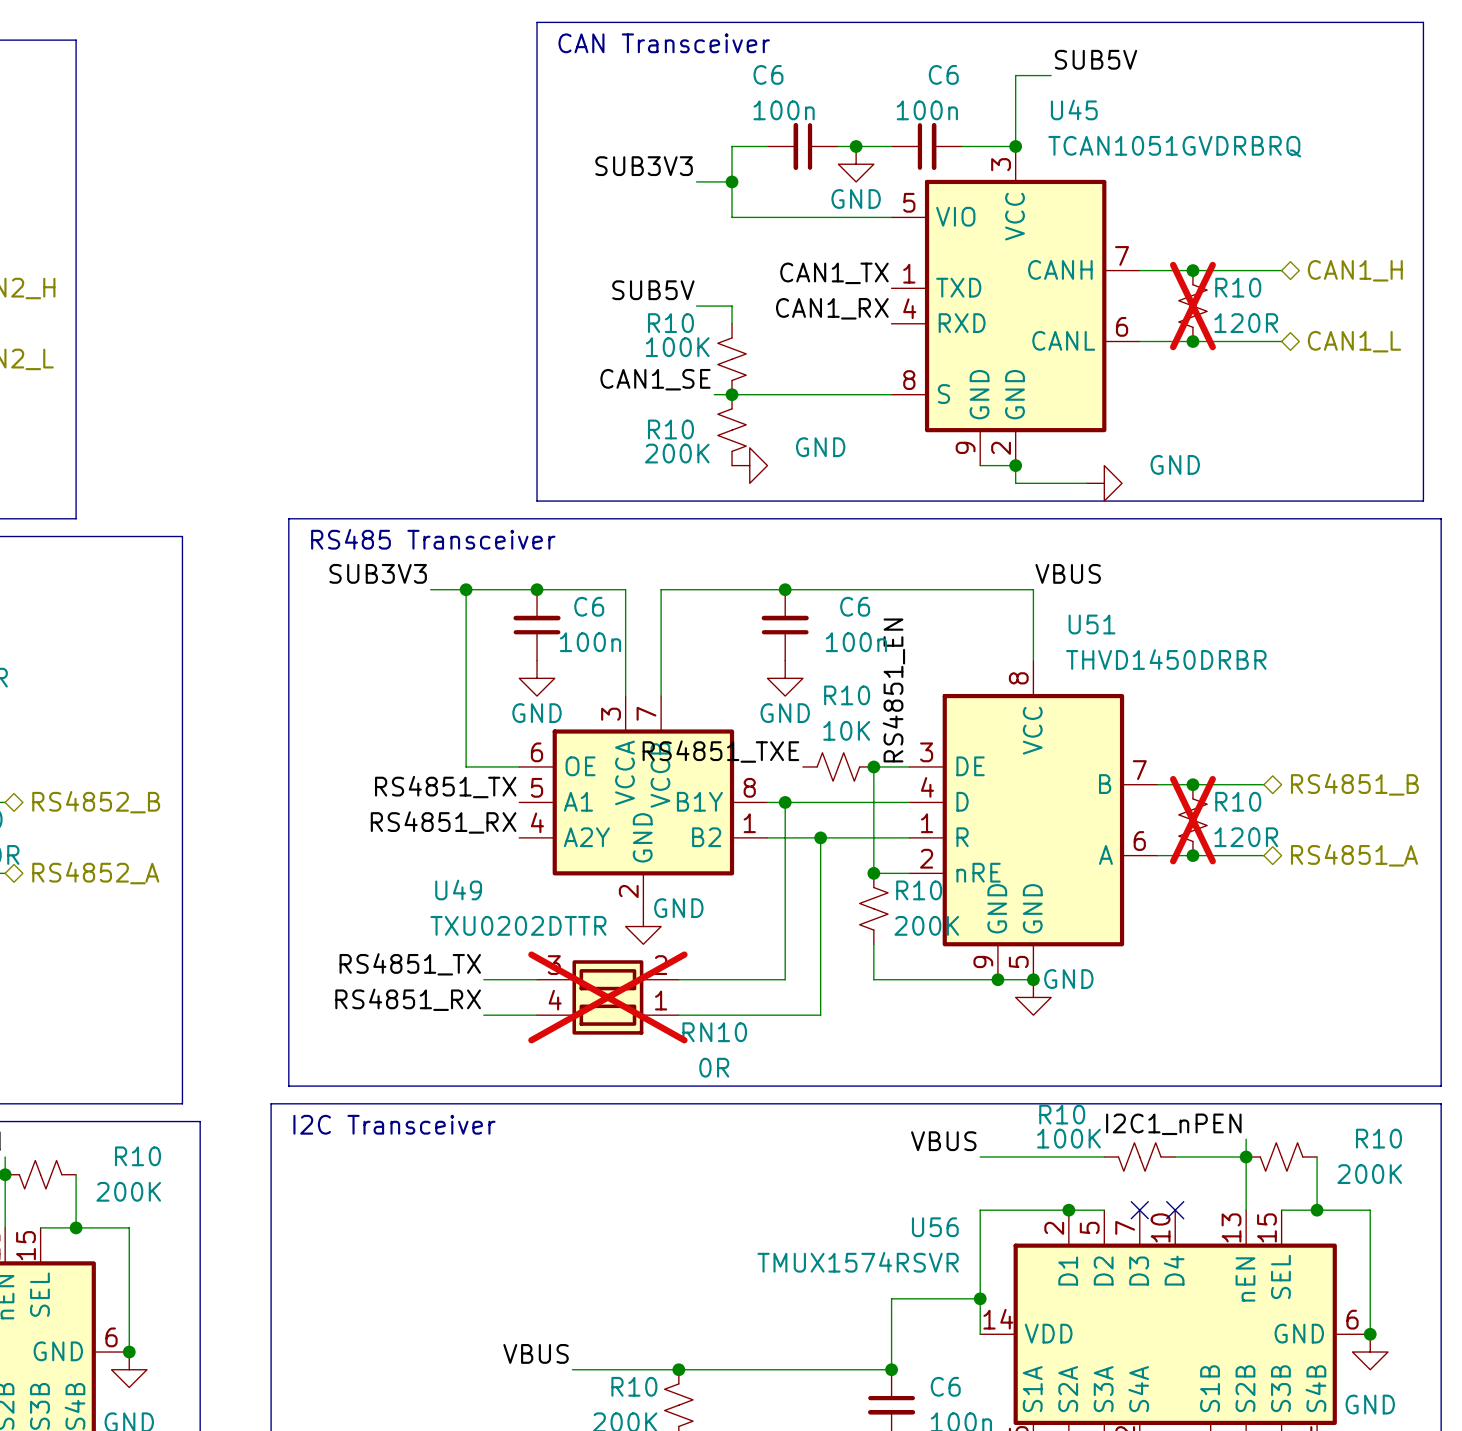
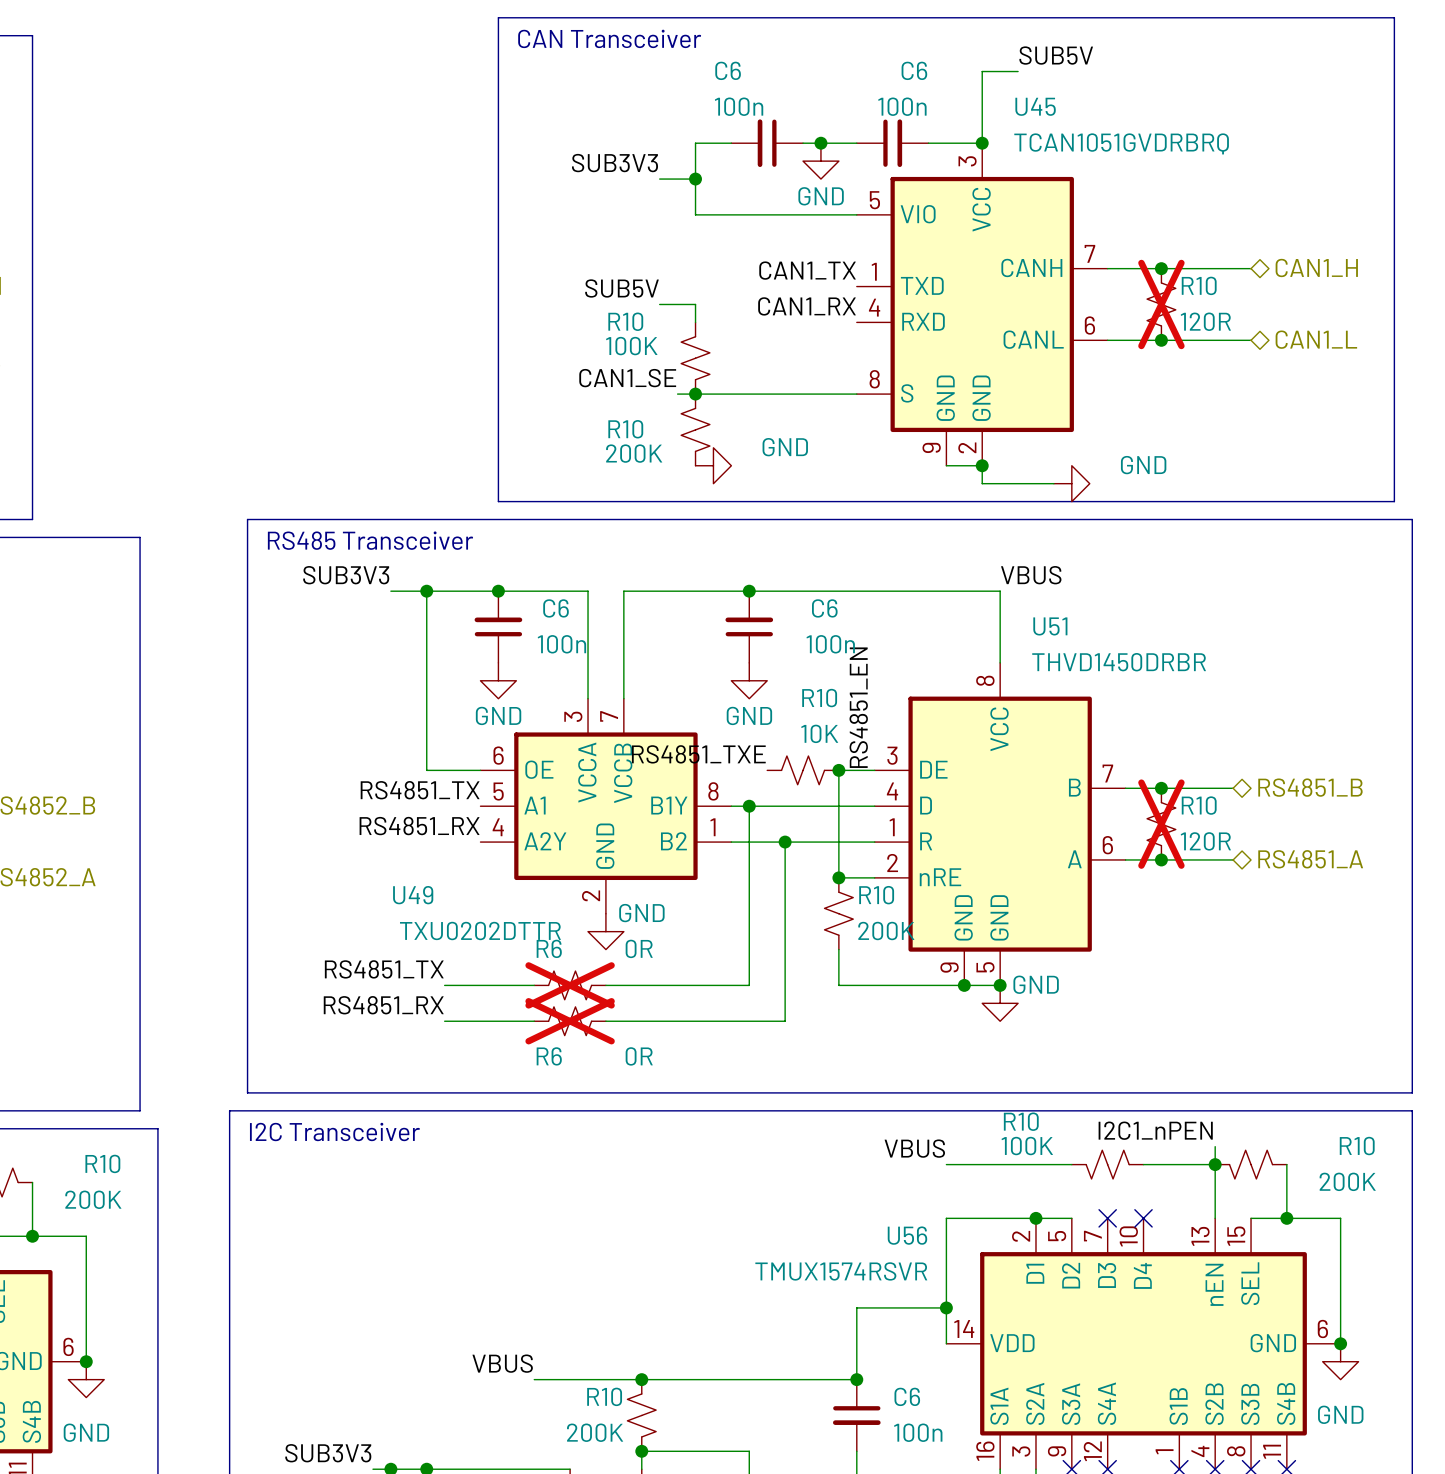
R6: none -> 0R (570, 985)
RN10: 0R (607, 997) -> none
R6: none -> 0R (570, 1021)

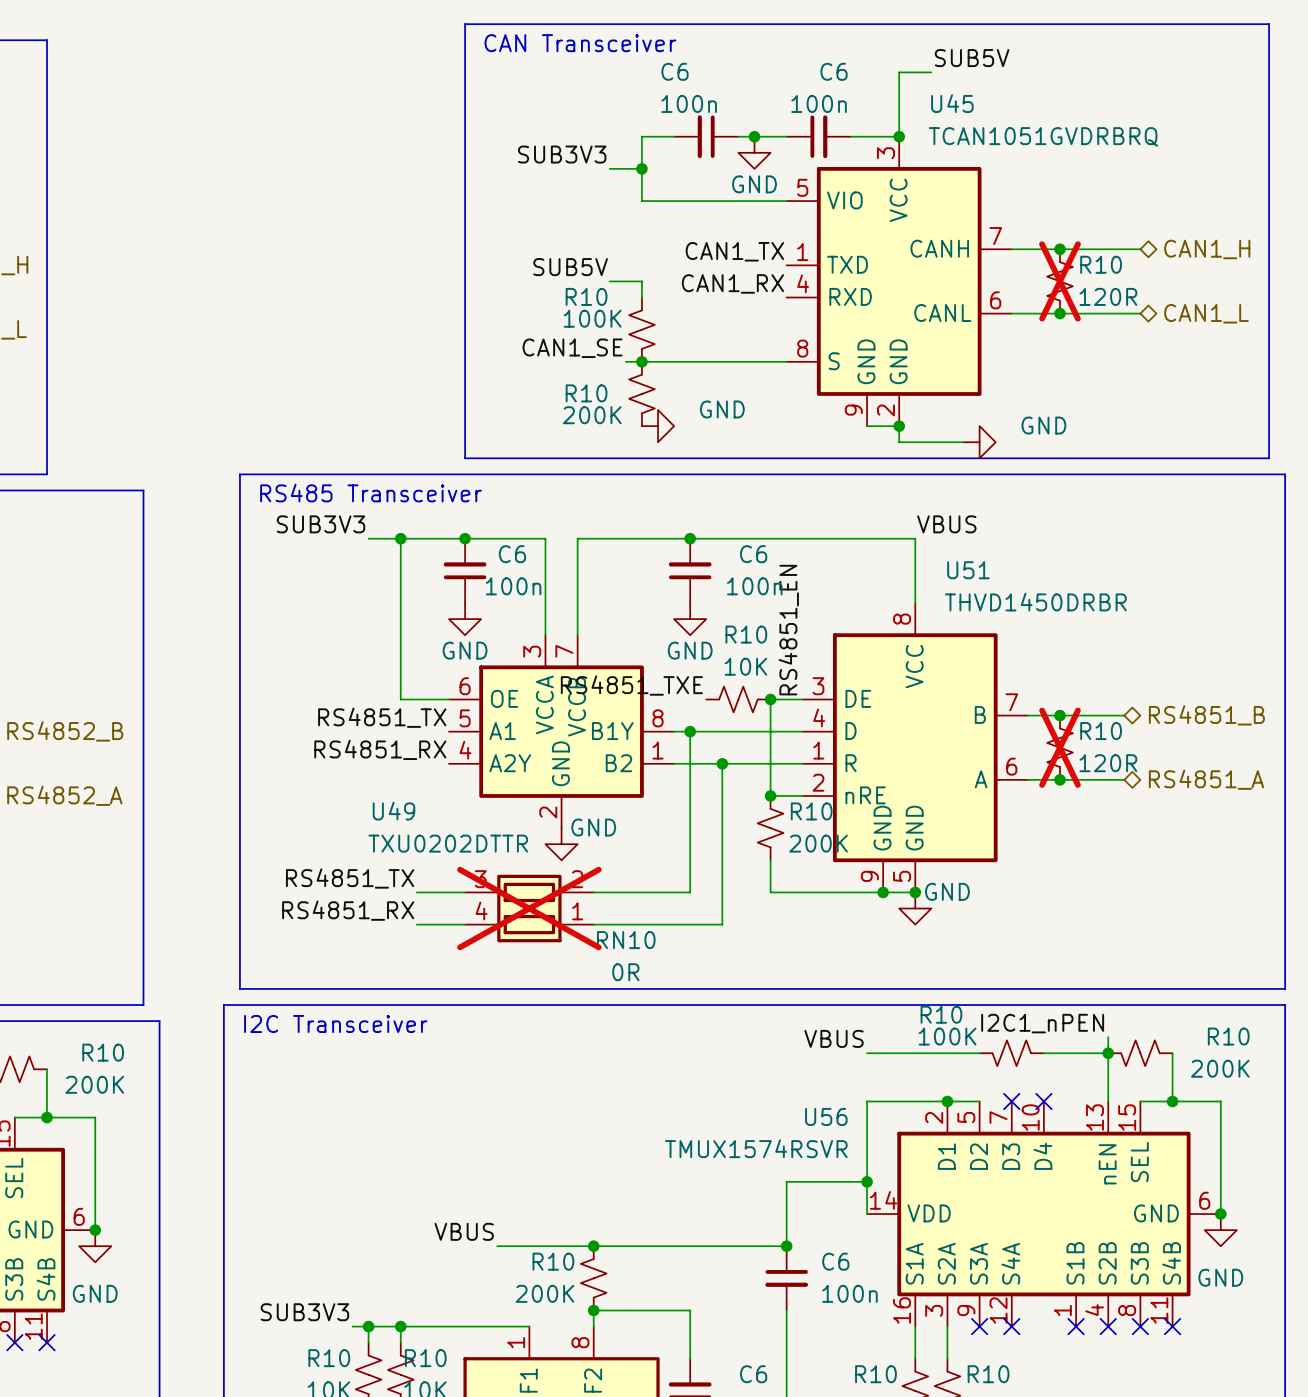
R6: 0R (570, 985) -> none
RN10: none -> 0R (529, 908)
R6: 0R (570, 1021) -> none

